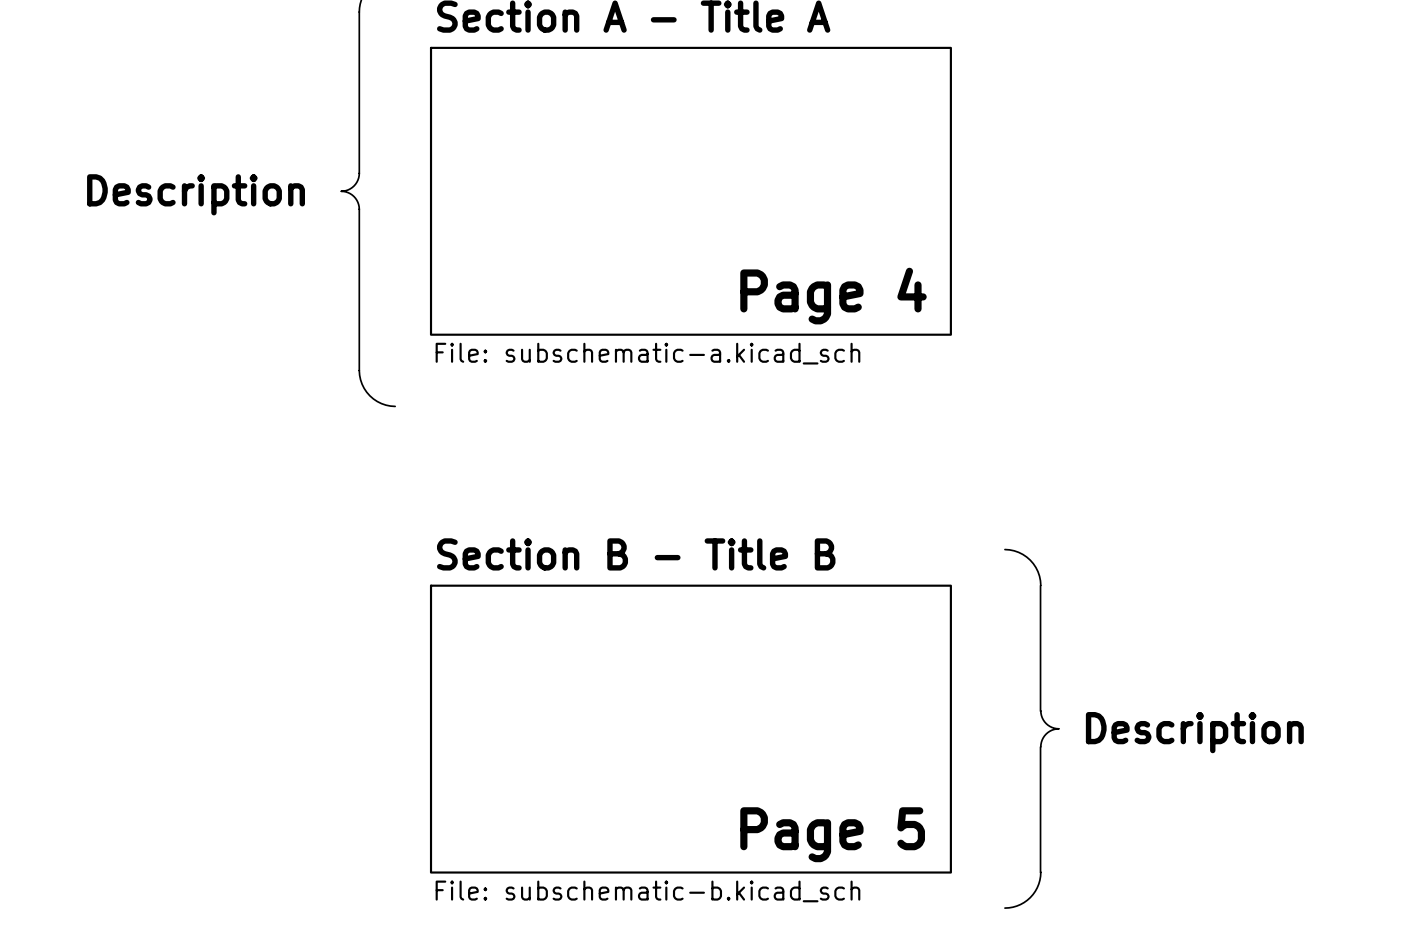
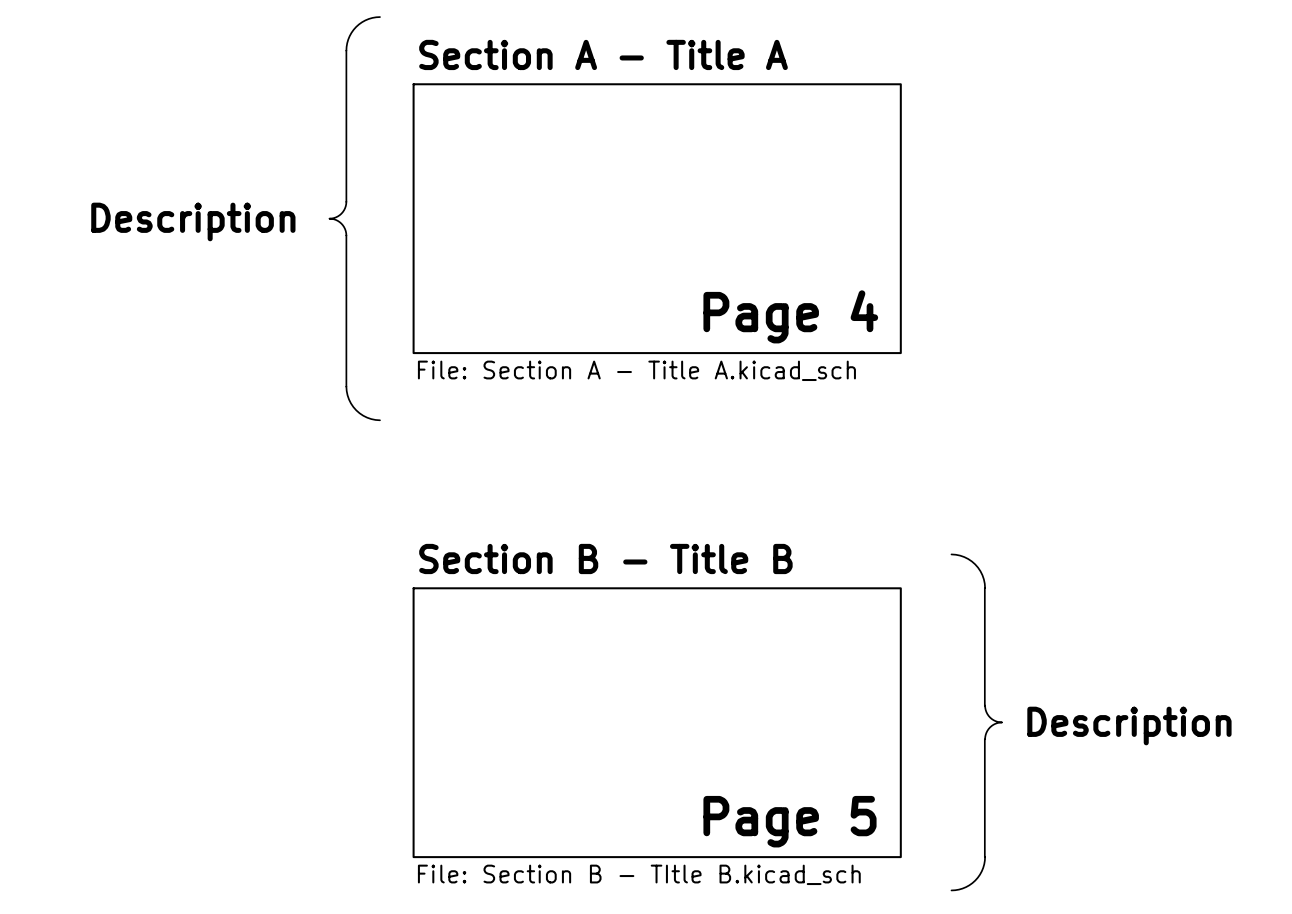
sheet Section A - Title A value: File: subschematic-a.kicad_sch (647, 353) -> File: Section A - Title A.kicad_sch (636, 370)
sheet Section B - Title B value: File: subschematic-b.kicad_sch (647, 891) -> File: Section B - TItle B.kicad_sch (639, 874)

